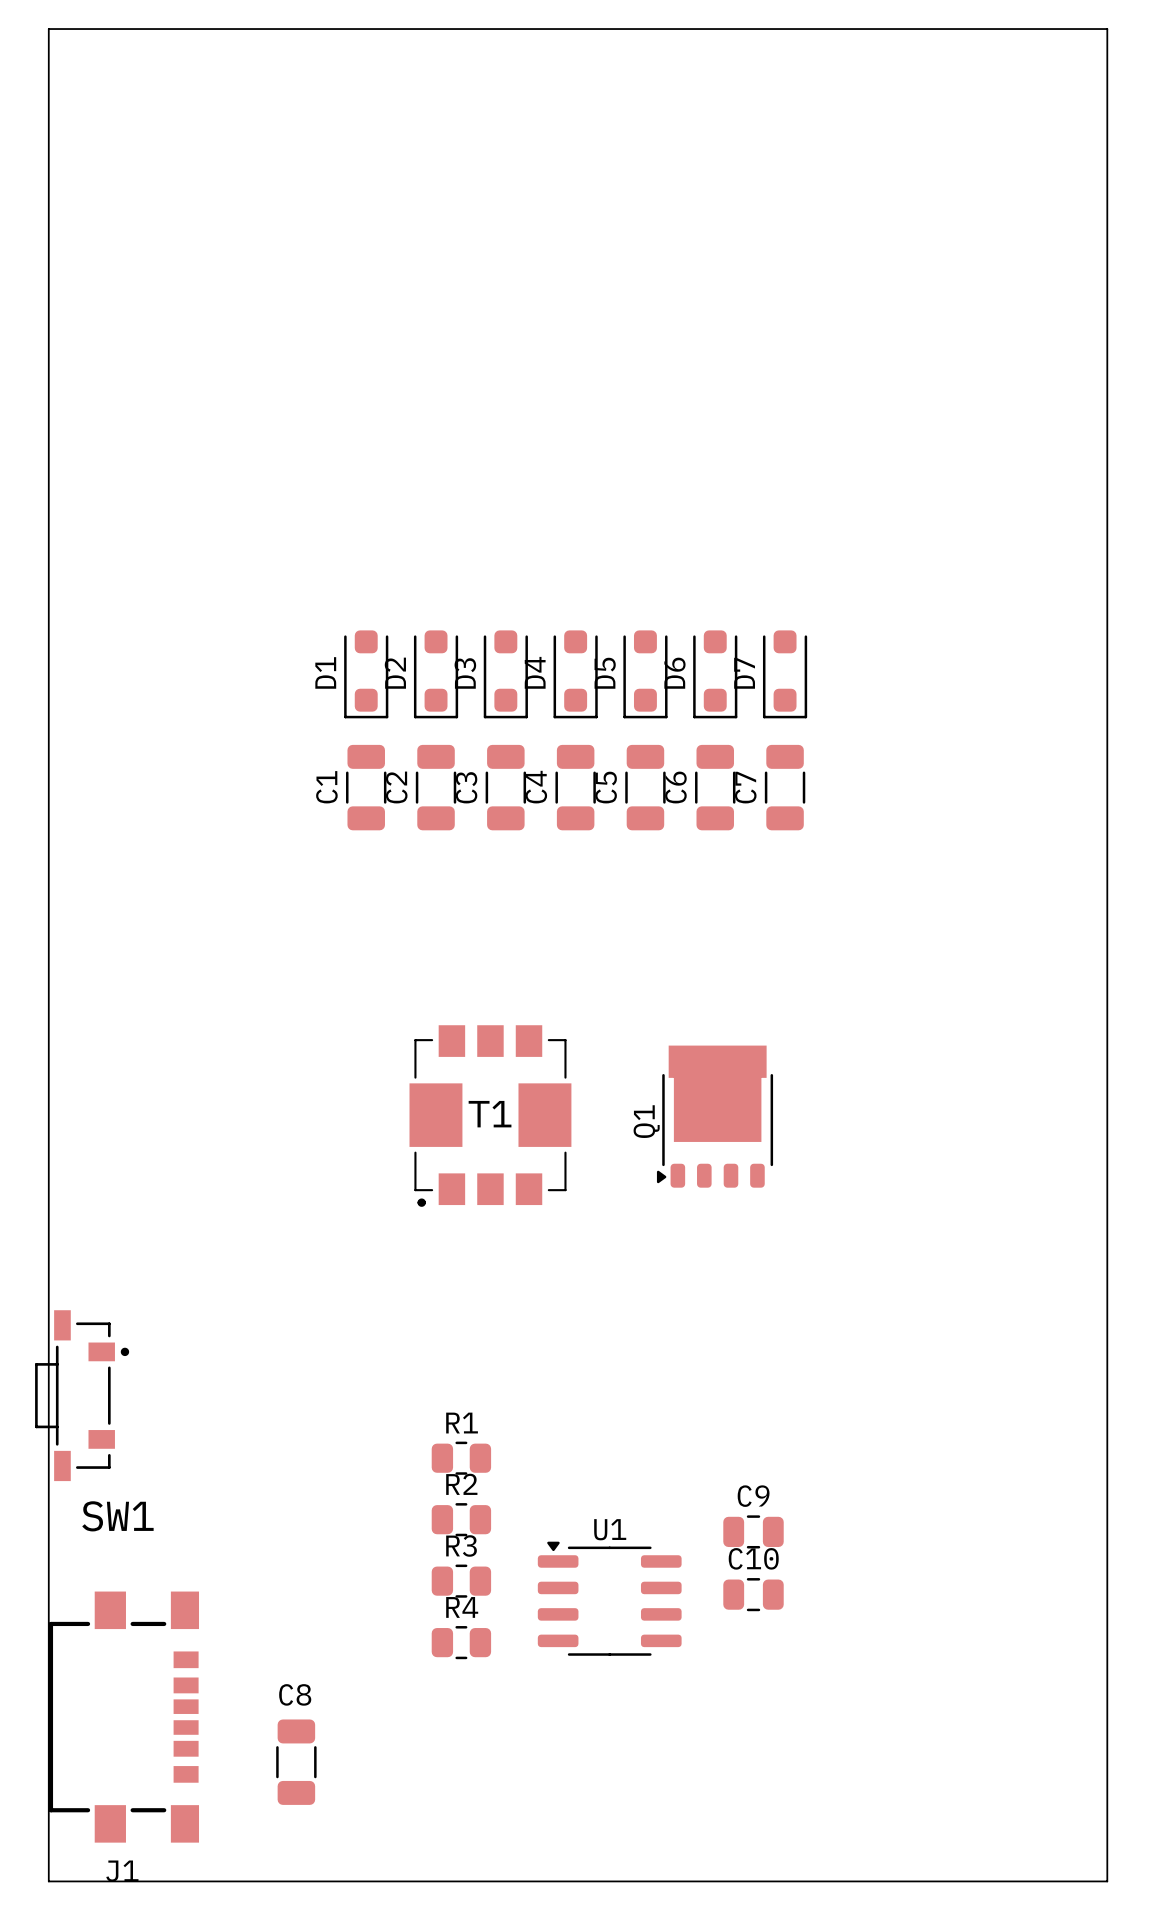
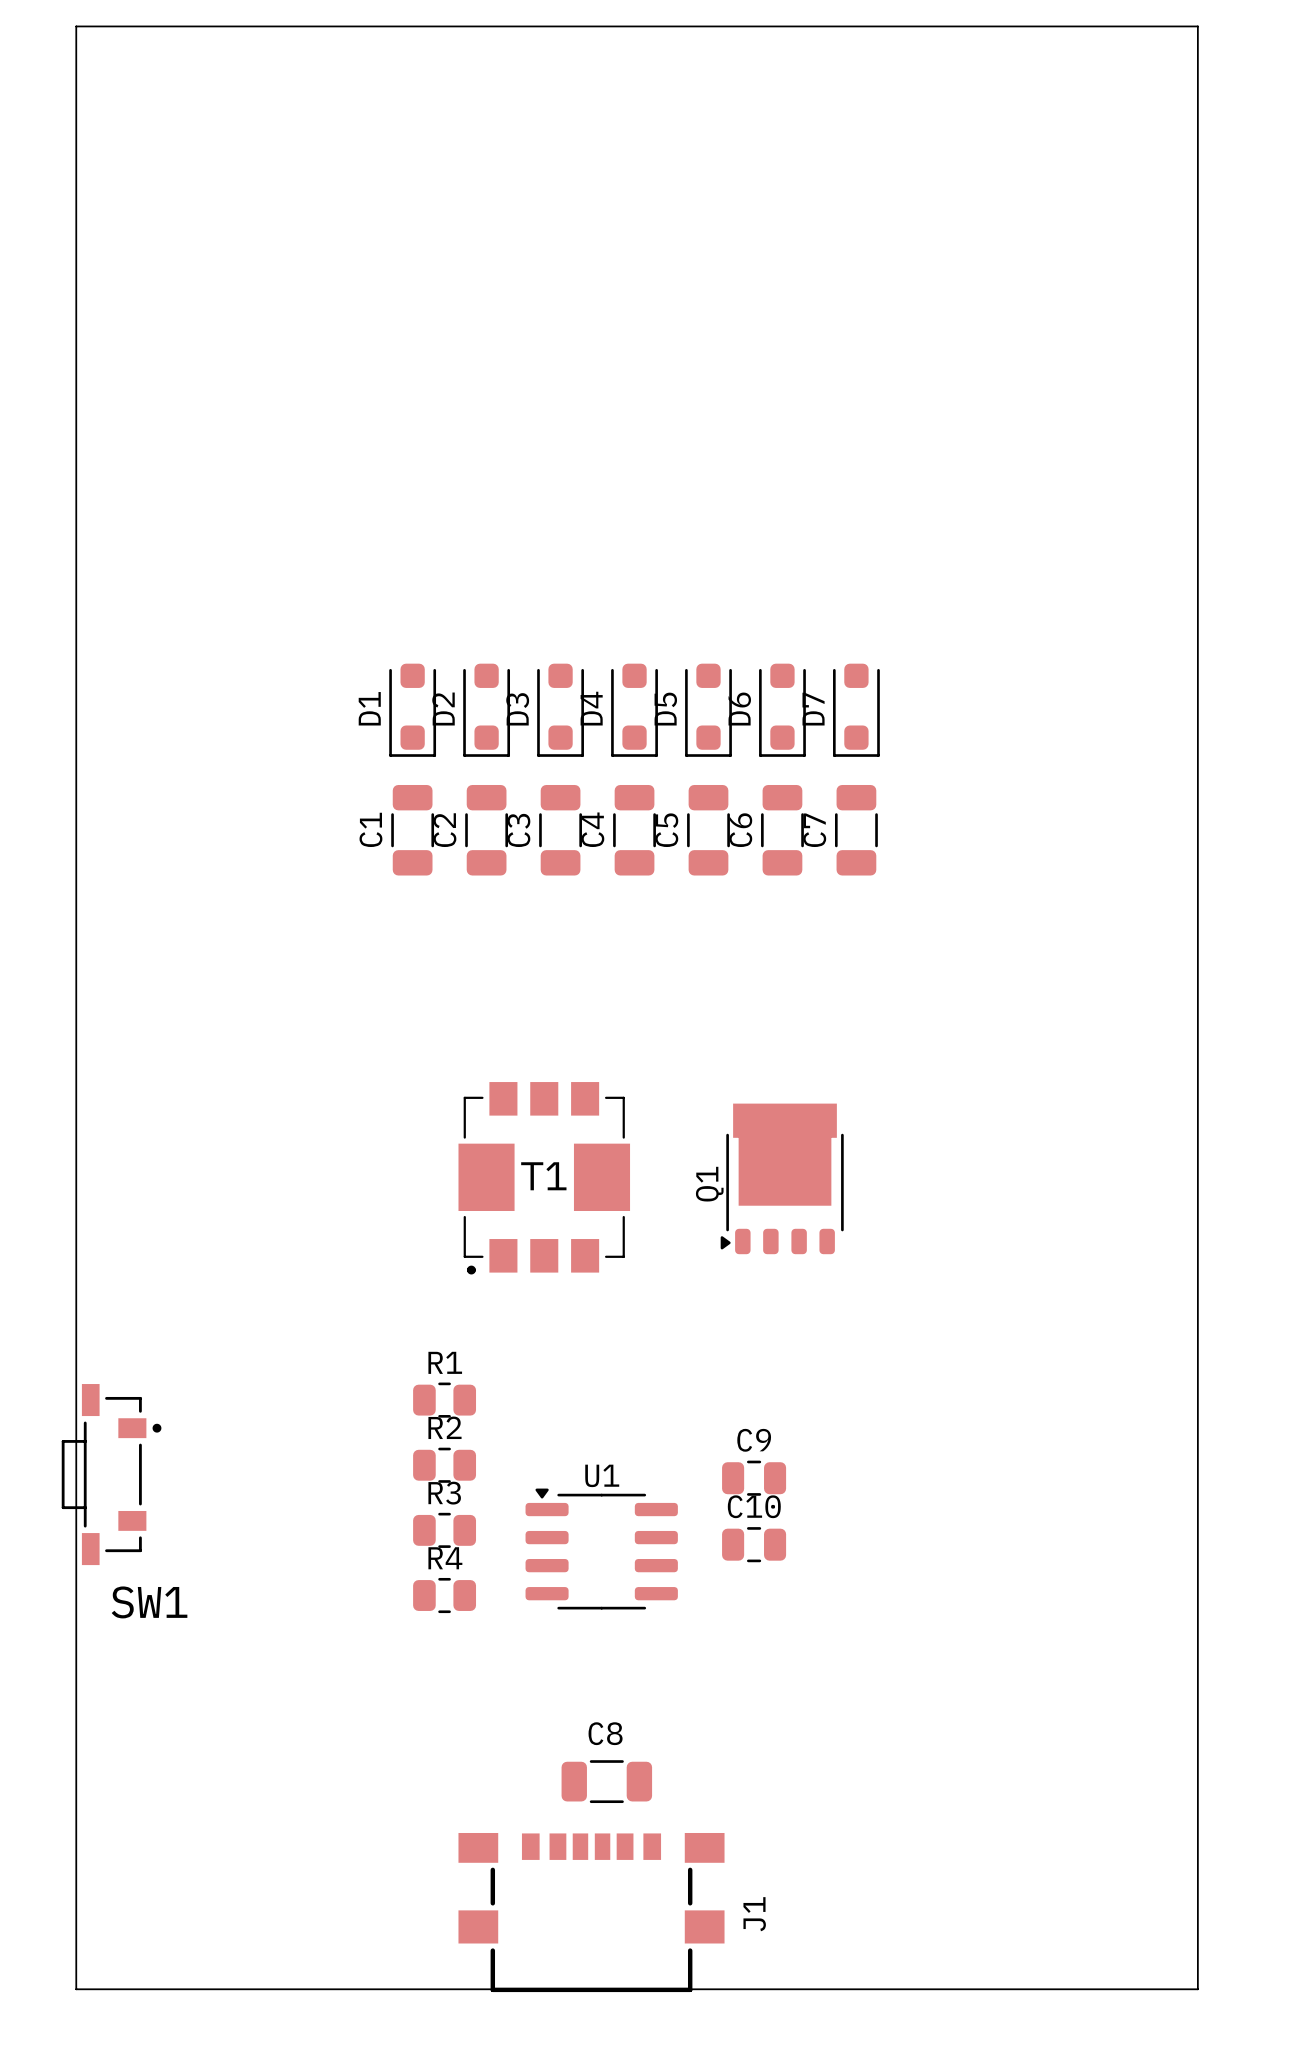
R1 position: (461, 1458) -> (444, 1400)
R2 position: (461, 1519) -> (444, 1465)
C9 position: (753, 1531) -> (754, 1478)
R3 position: (461, 1581) -> (444, 1530)
C10 position: (753, 1594) -> (754, 1544)
U1 position: (609, 1598) -> (601, 1549)
R4 position: (461, 1642) -> (444, 1595)
J1 rotation: 0° (123, 1717) -> 90° counterclockwise (591, 1912)
J1 position: (123, 1717) -> (591, 1912)
C8 rotation: 0° (296, 1762) -> 90° clockwise (606, 1781)
C8 position: (296, 1762) -> (606, 1781)

